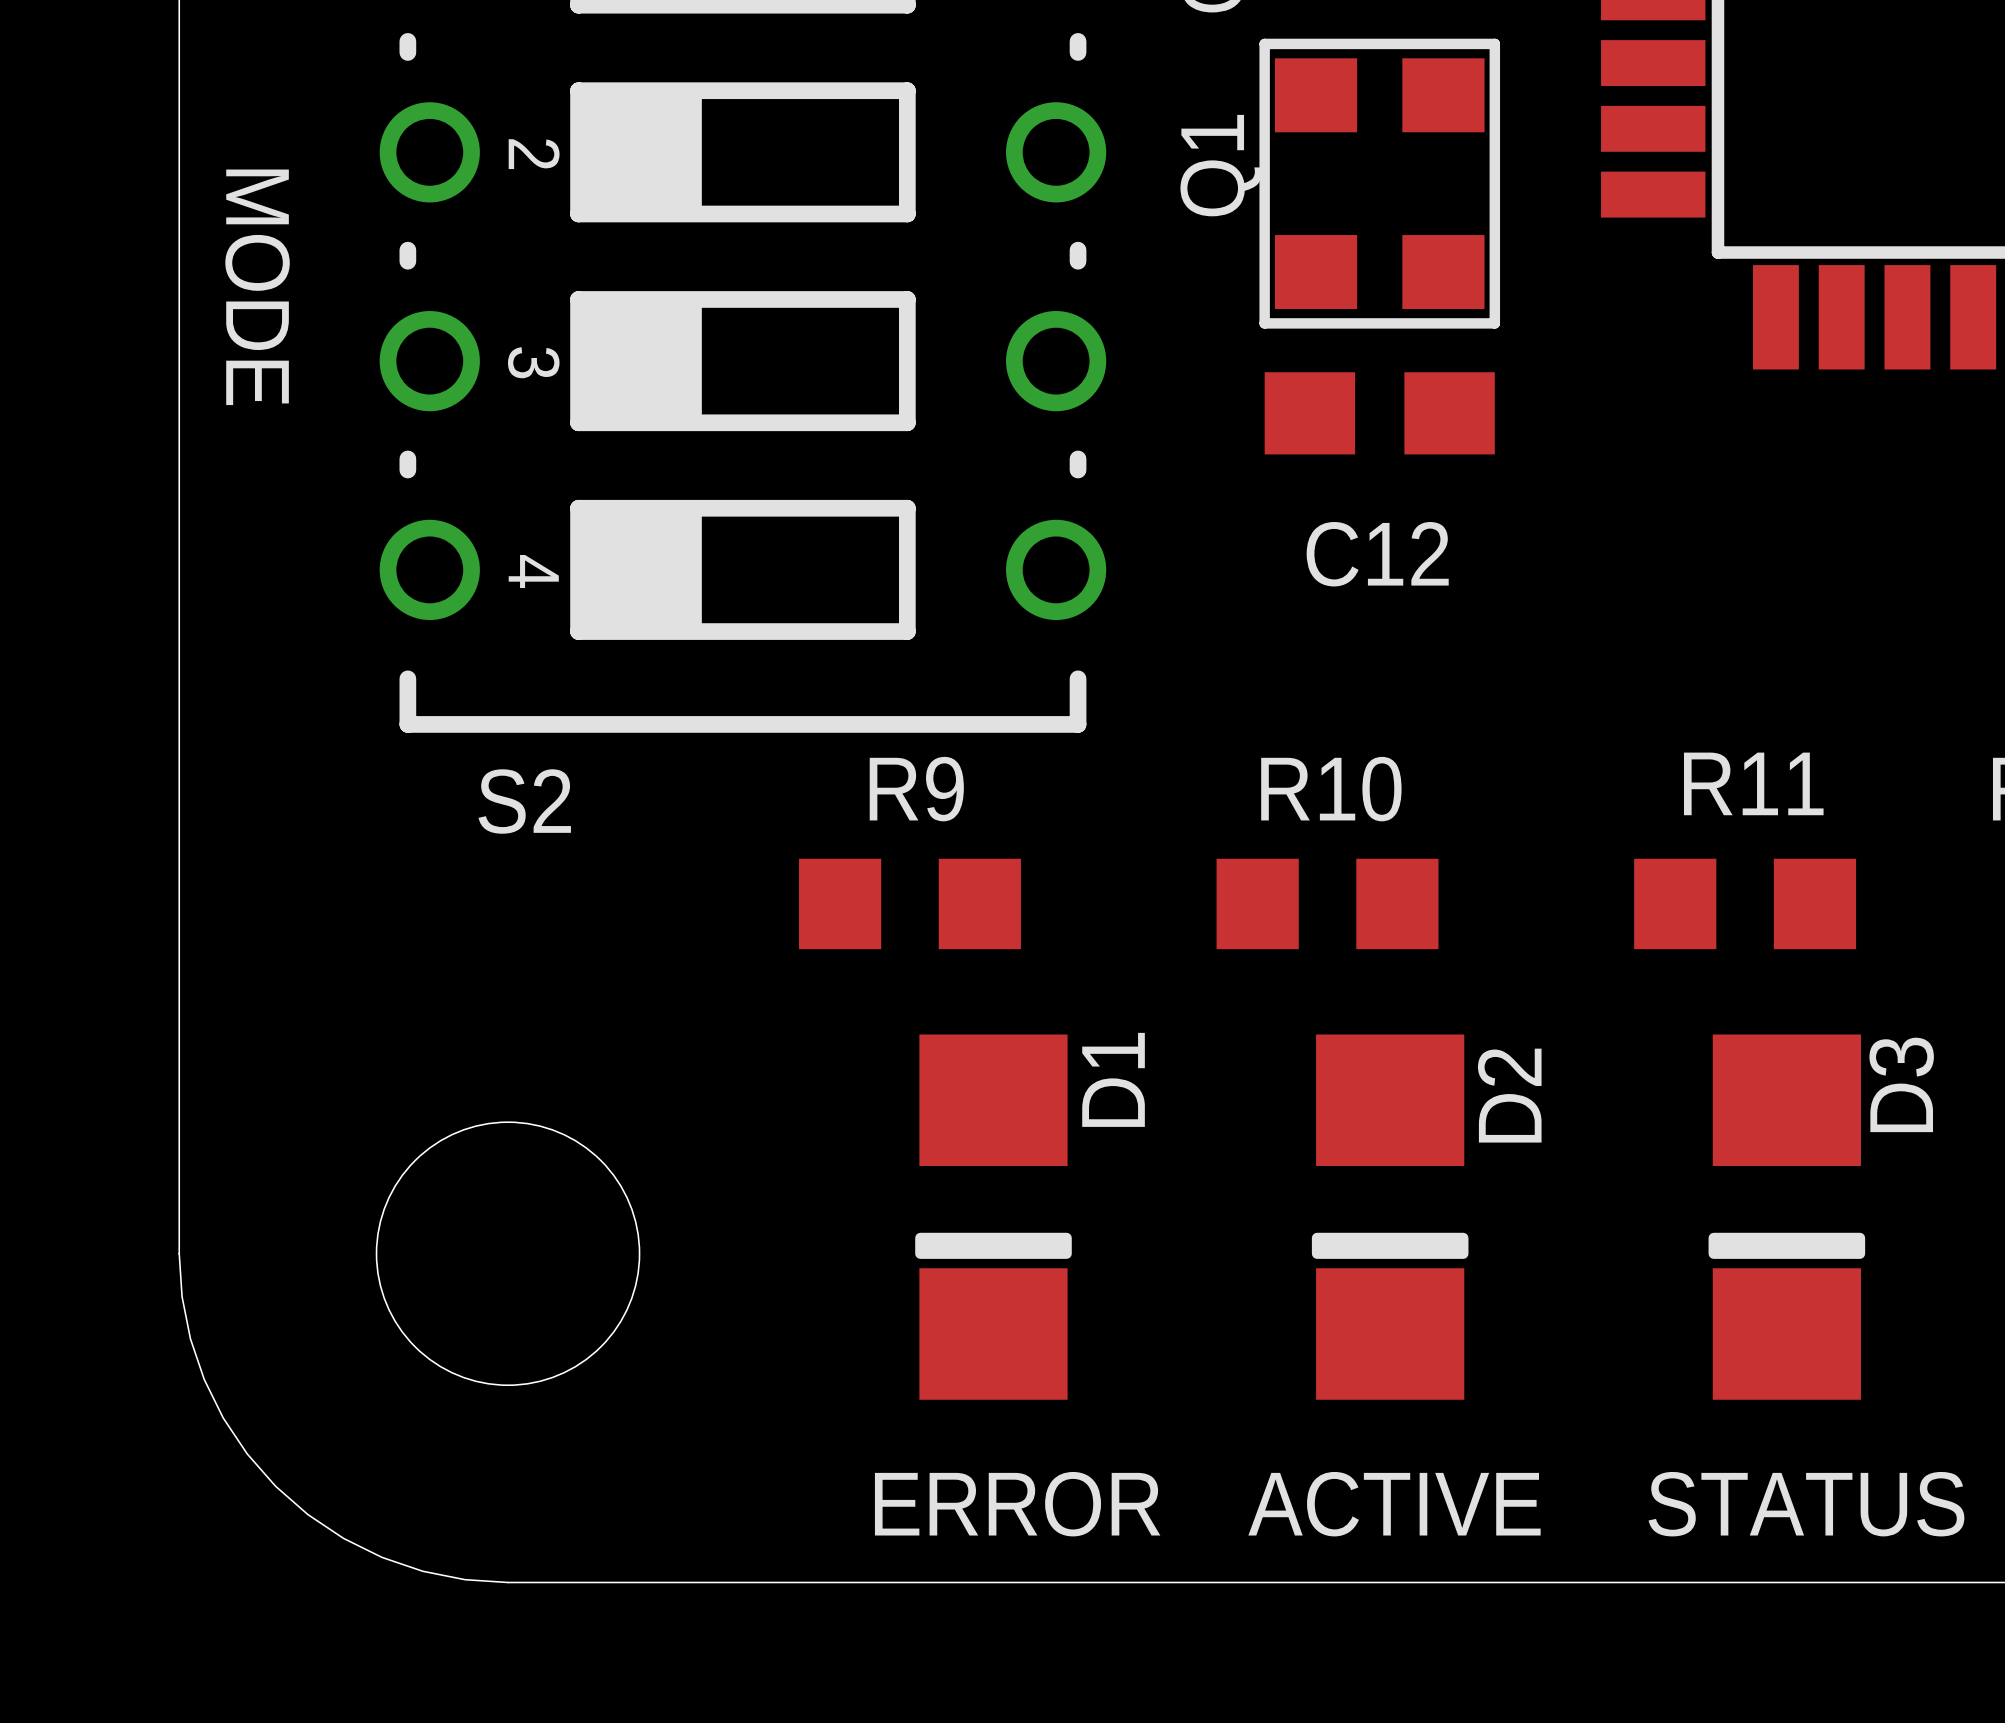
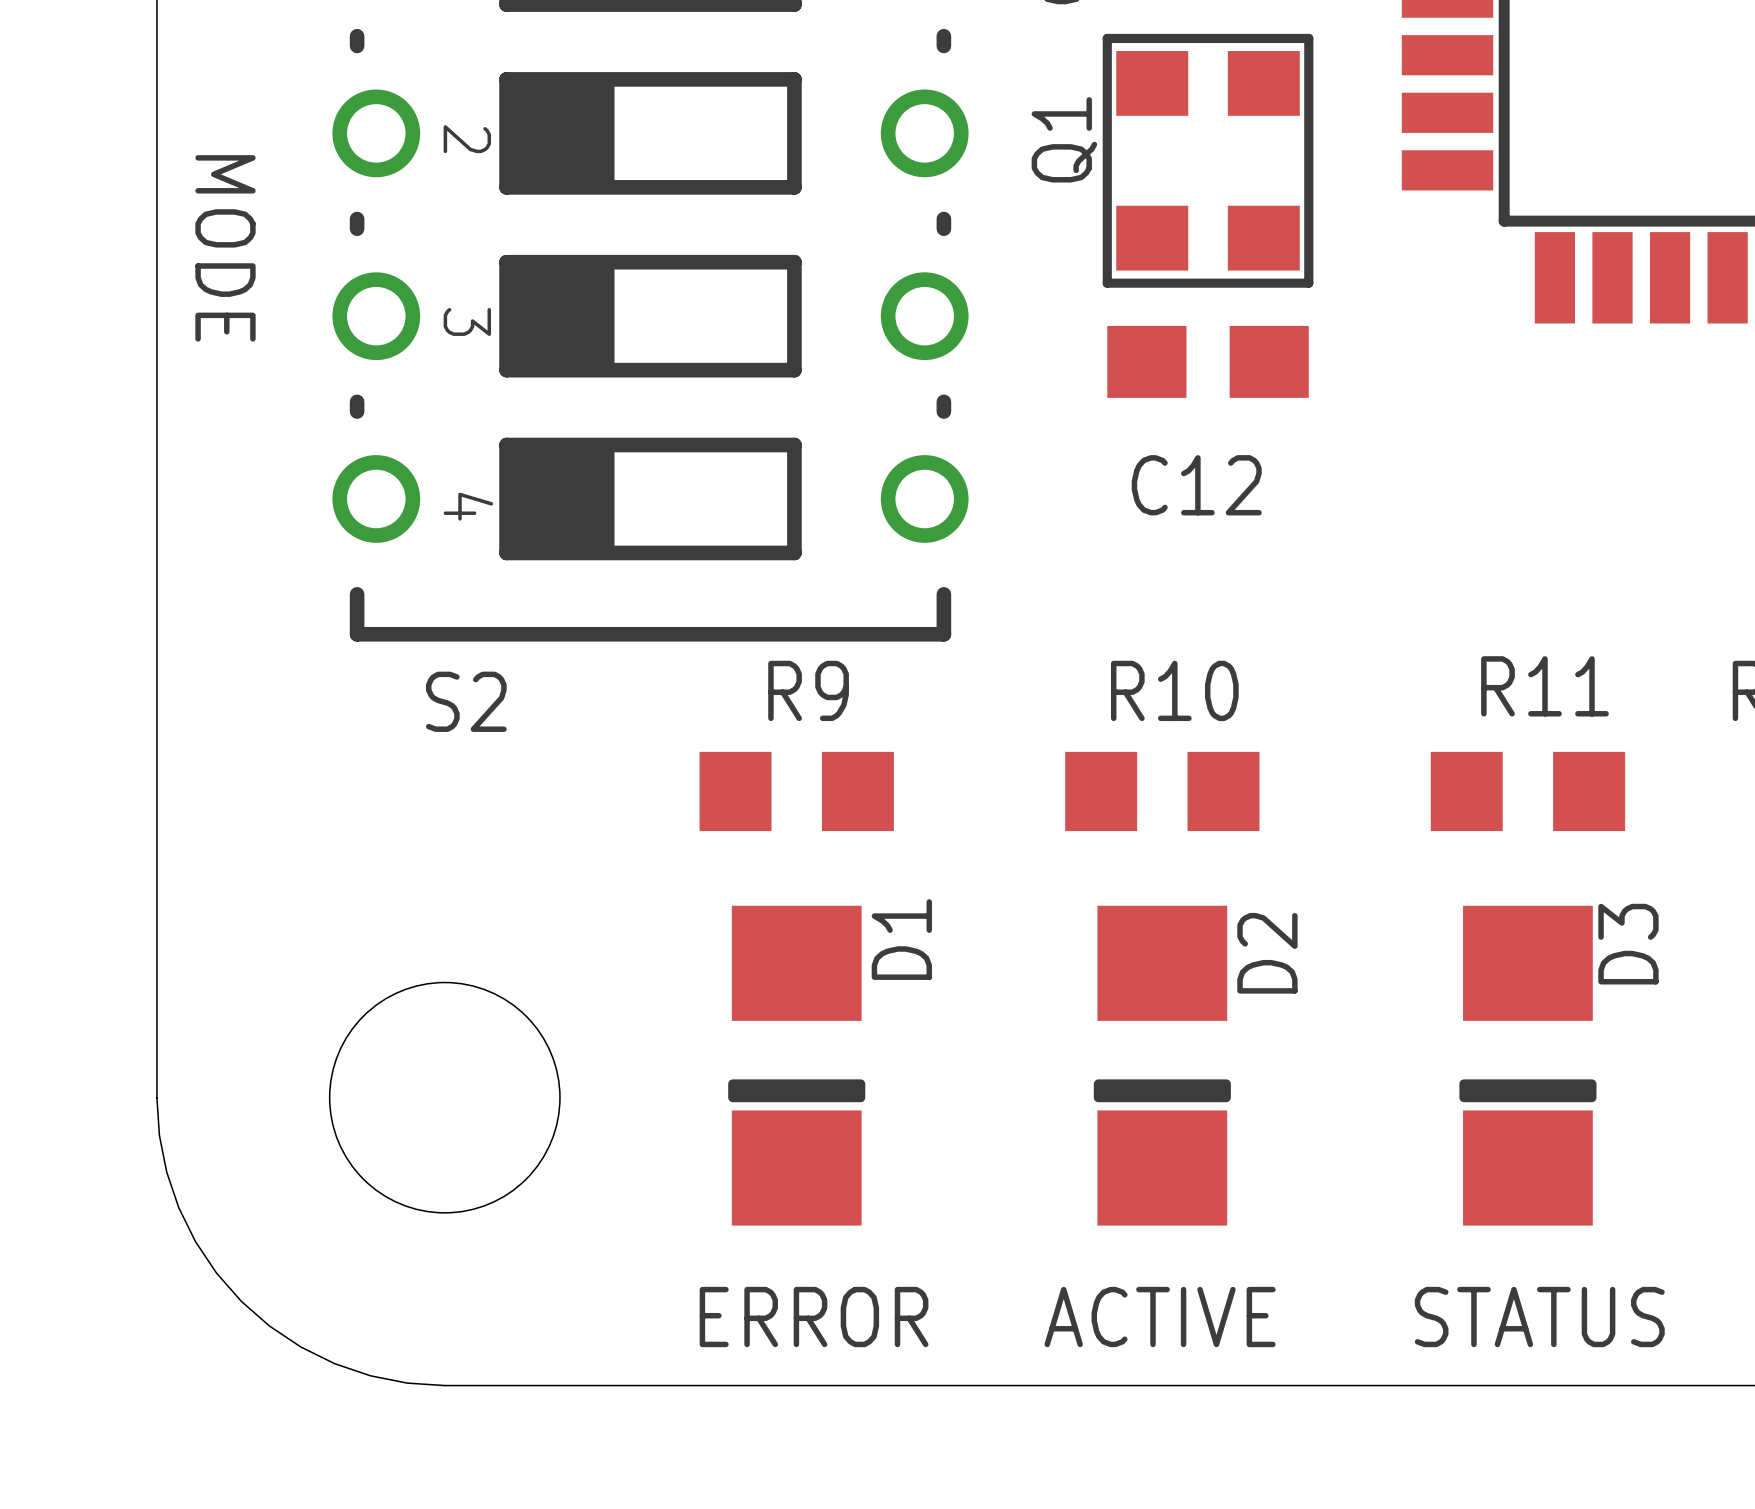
D1 position: (993, 1217) -> (796, 1065)
D2 position: (1390, 1217) -> (1162, 1065)
D3 position: (1786, 1217) -> (1527, 1065)
text position: ERROR (1017, 1504) -> ERROR (814, 1317)
text position: ACTIVE (1394, 1504) -> ACTIVE (1160, 1317)
text position: STATUS (1806, 1504) -> STATUS (1539, 1317)

